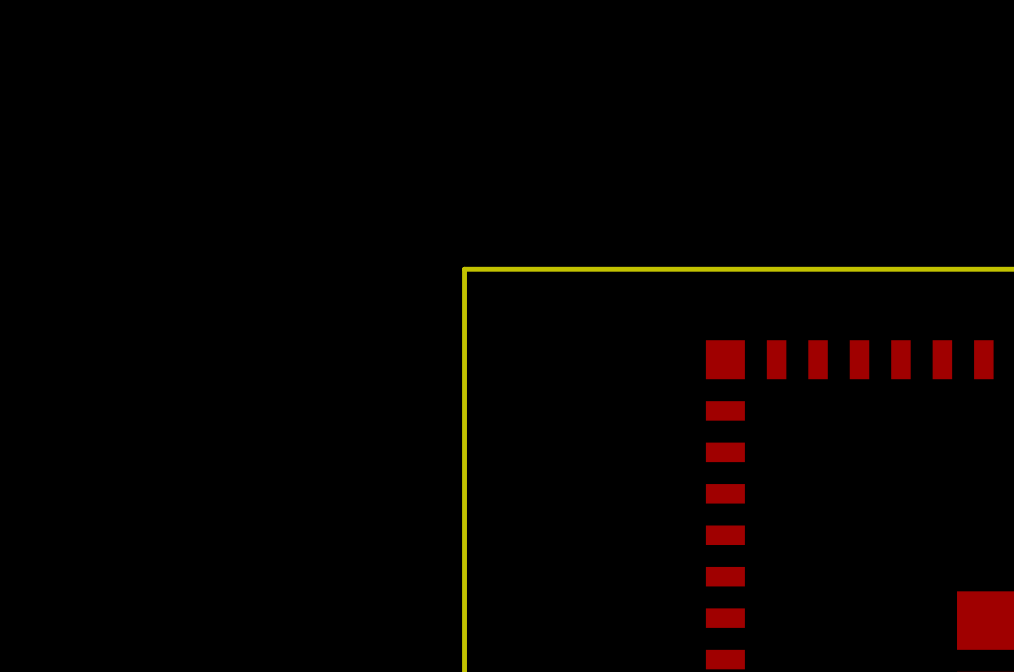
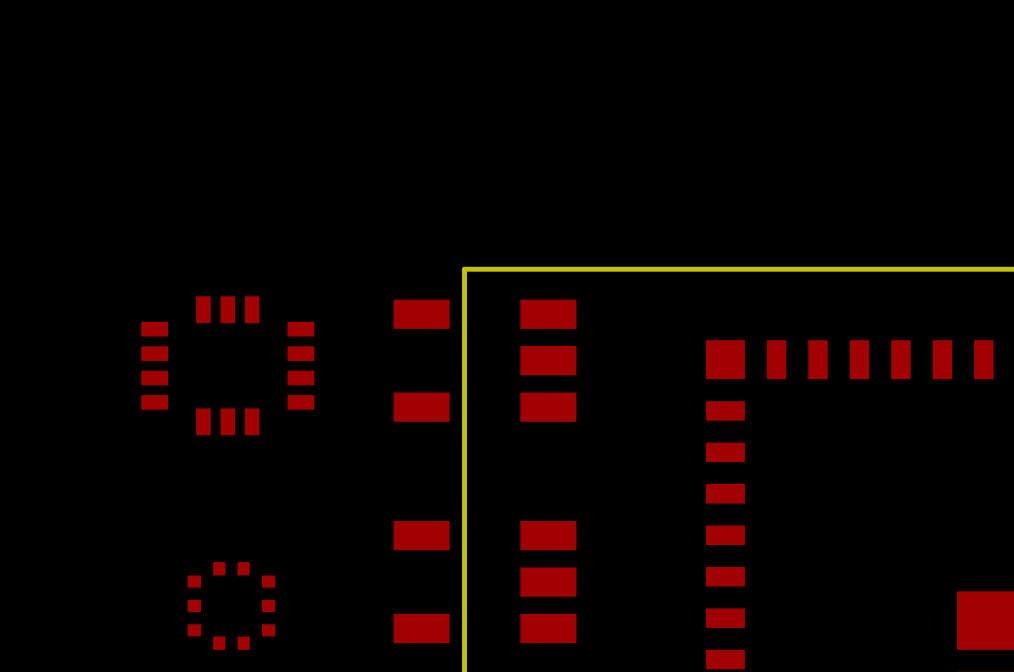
part: none -> (485, 360)
part: none -> (227, 365)
part: none -> (485, 582)
part: none -> (231, 605)

